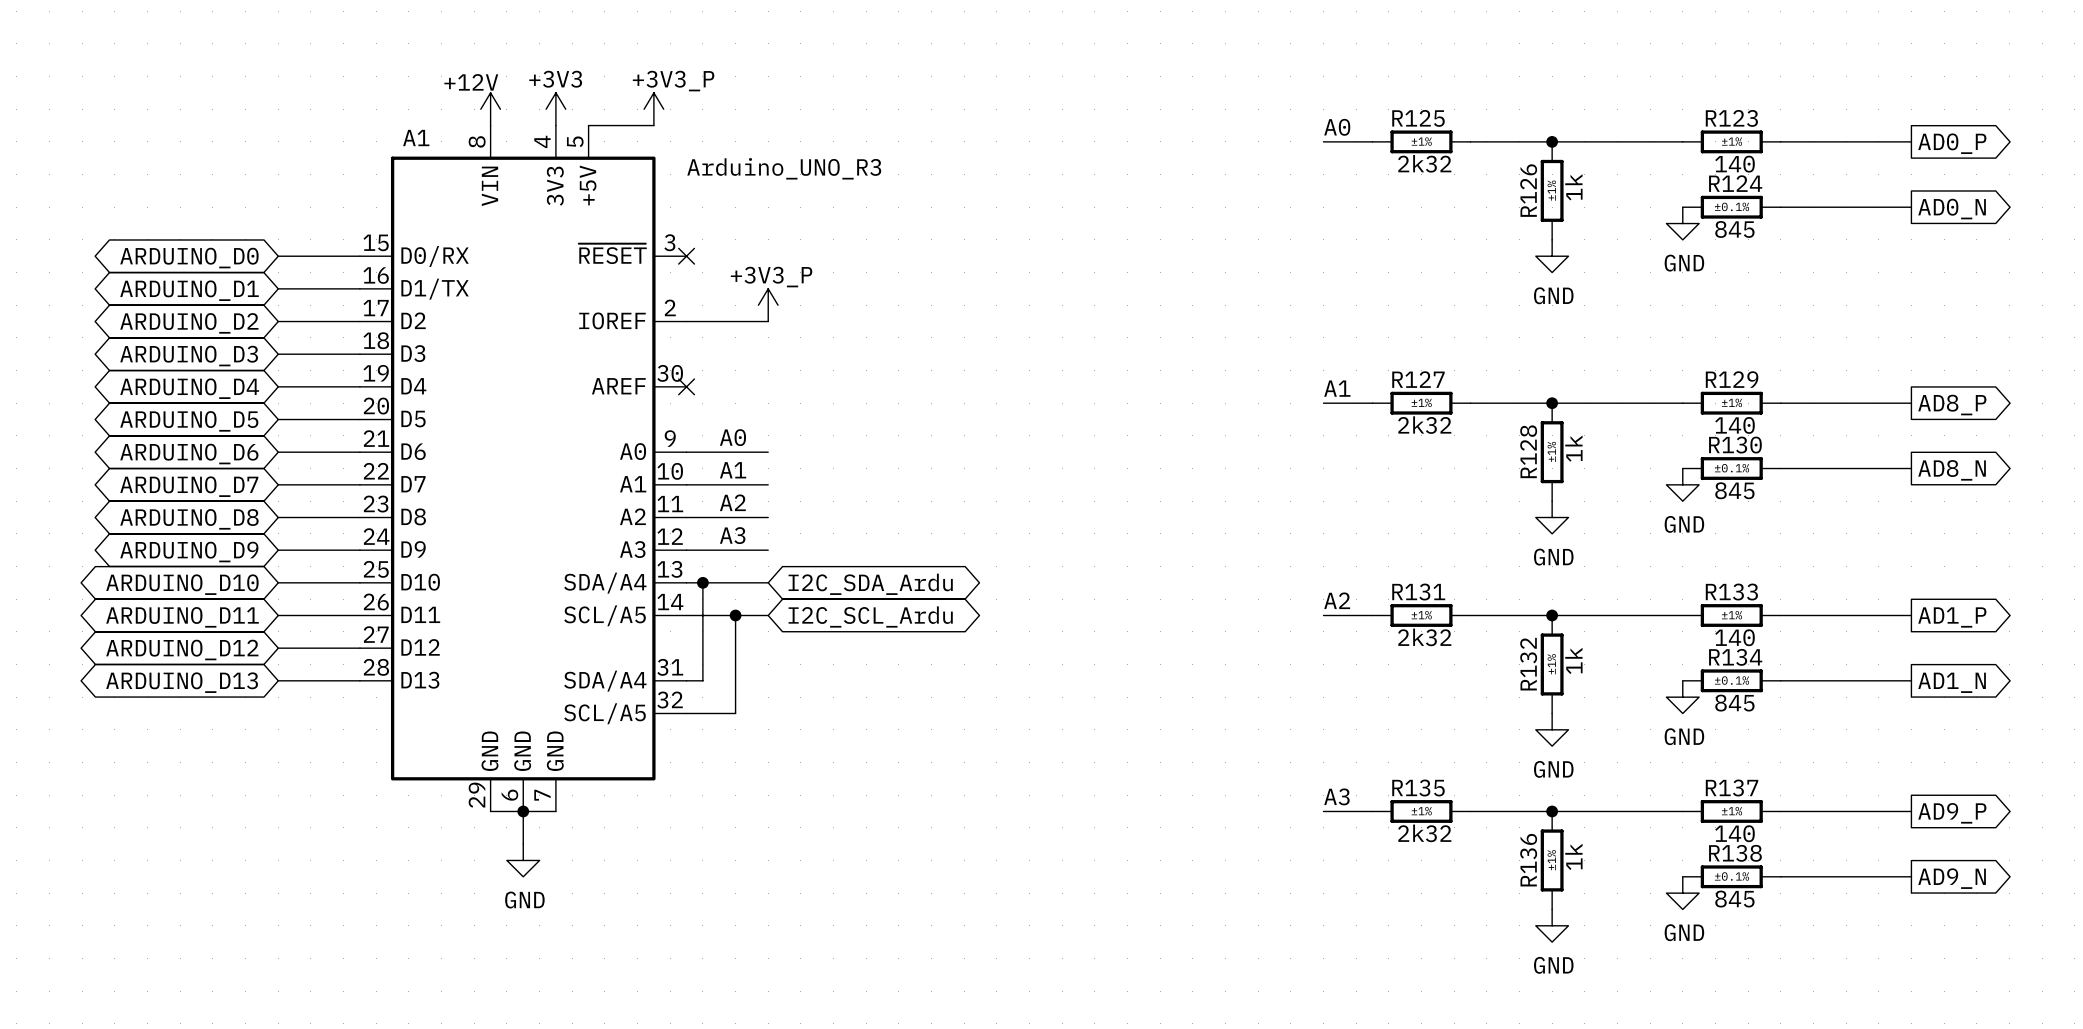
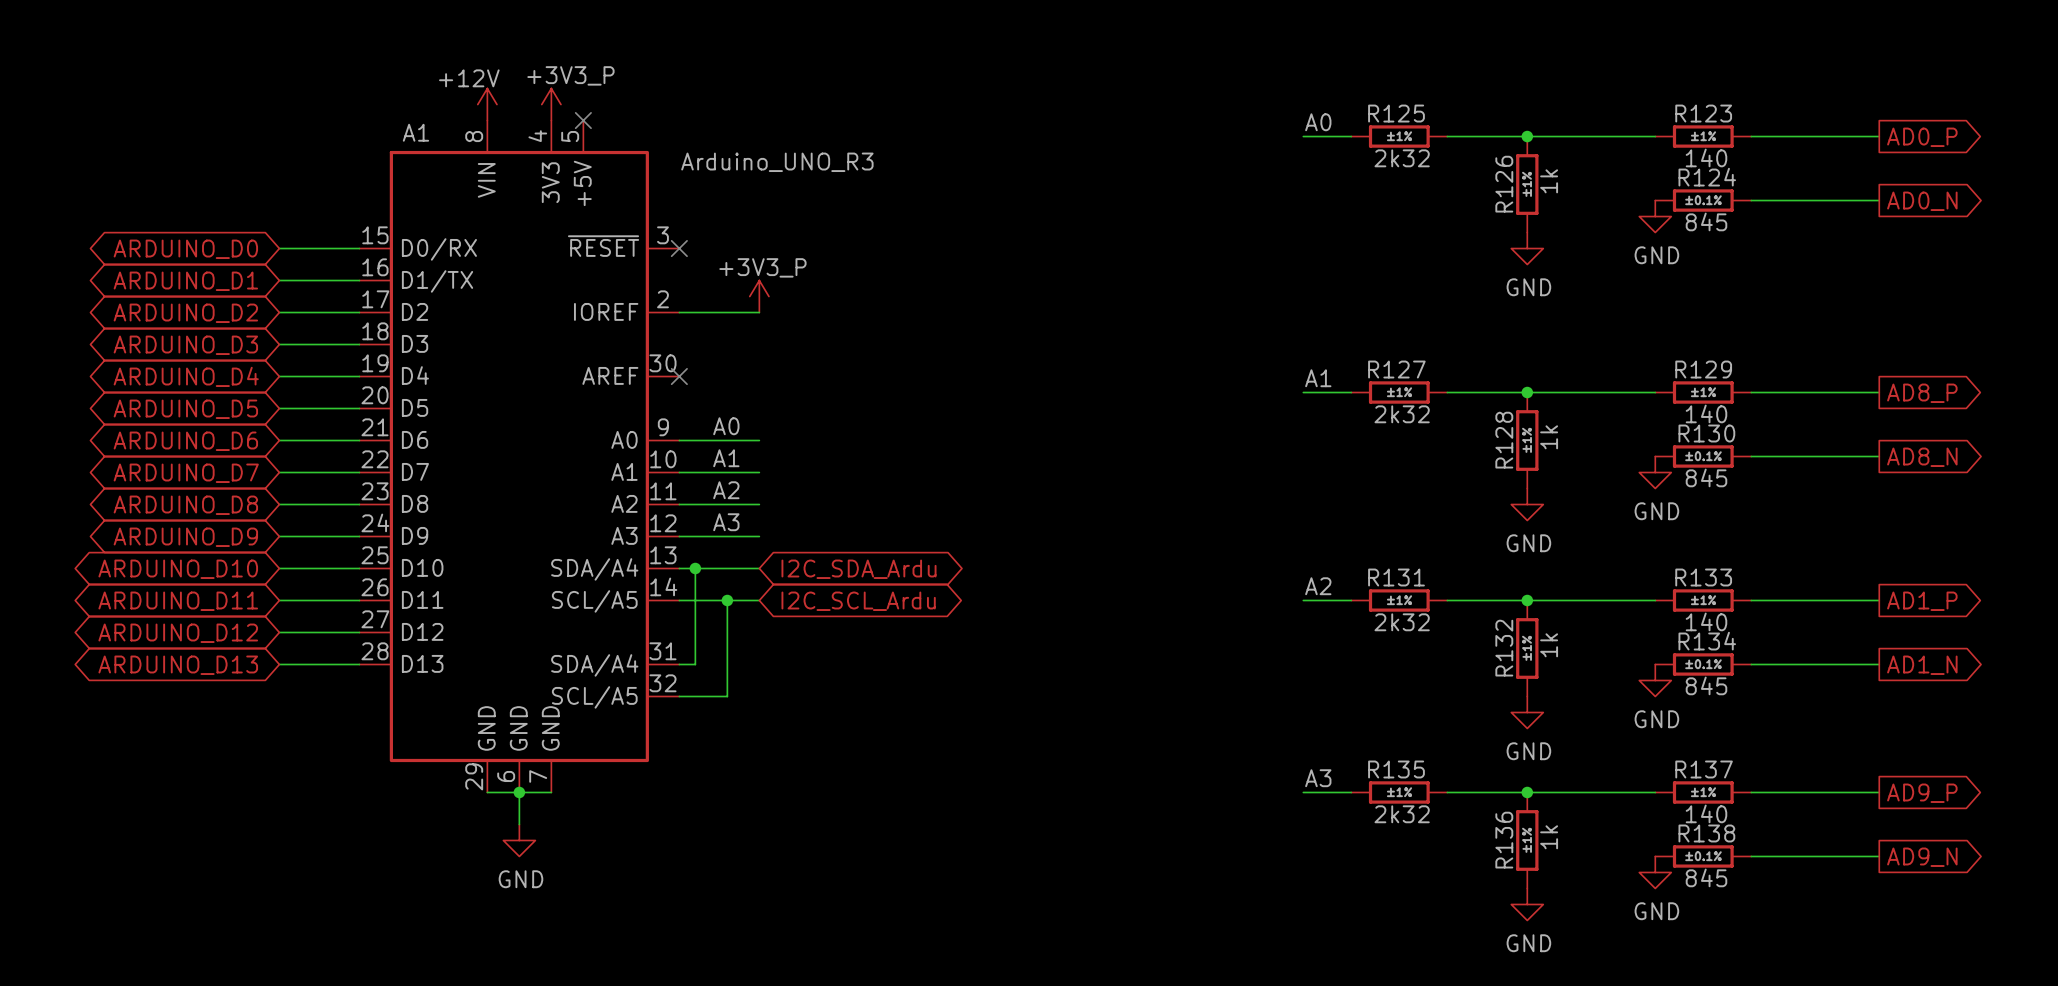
power symbol: +3V3 (555, 109) -> +3V3_P (551, 104)
power symbol: +3V3_P (653, 109) -> none
wire: (588, 125) (653, 125) -> none
no-connect mark: none -> (583, 120)

